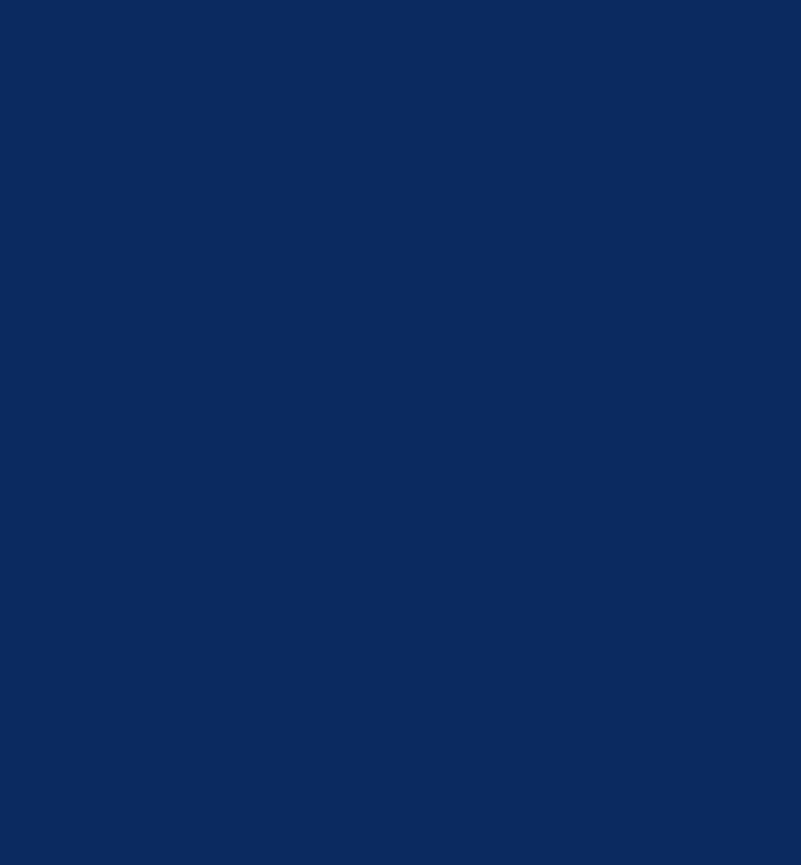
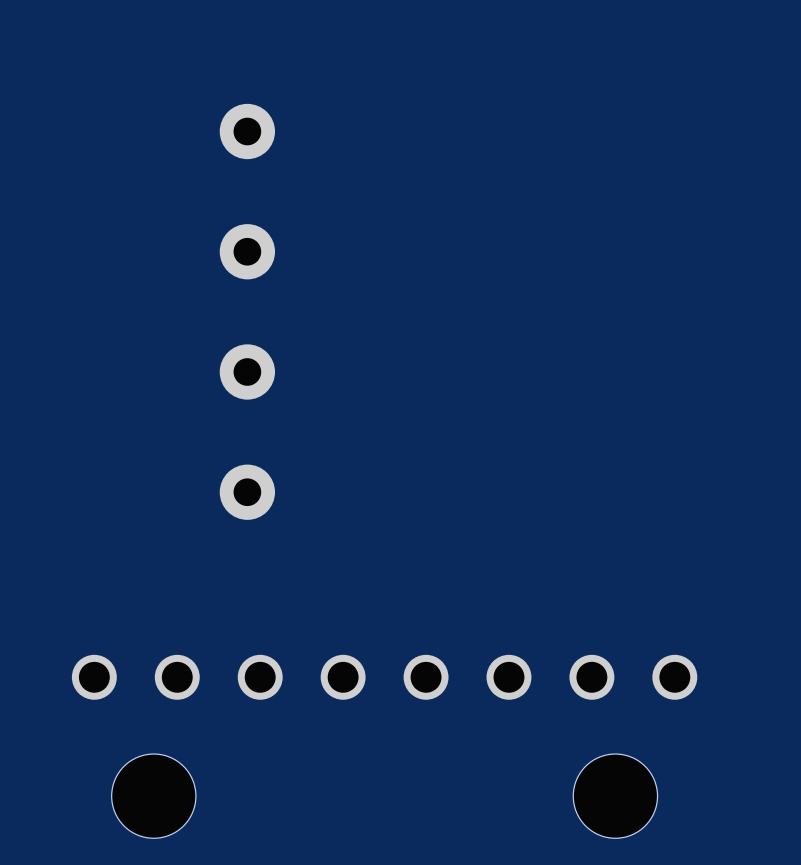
part: none -> (247, 131)
part: none -> (247, 251)
part: none -> (247, 371)
part: none -> (247, 492)
part: none -> (355, 746)

